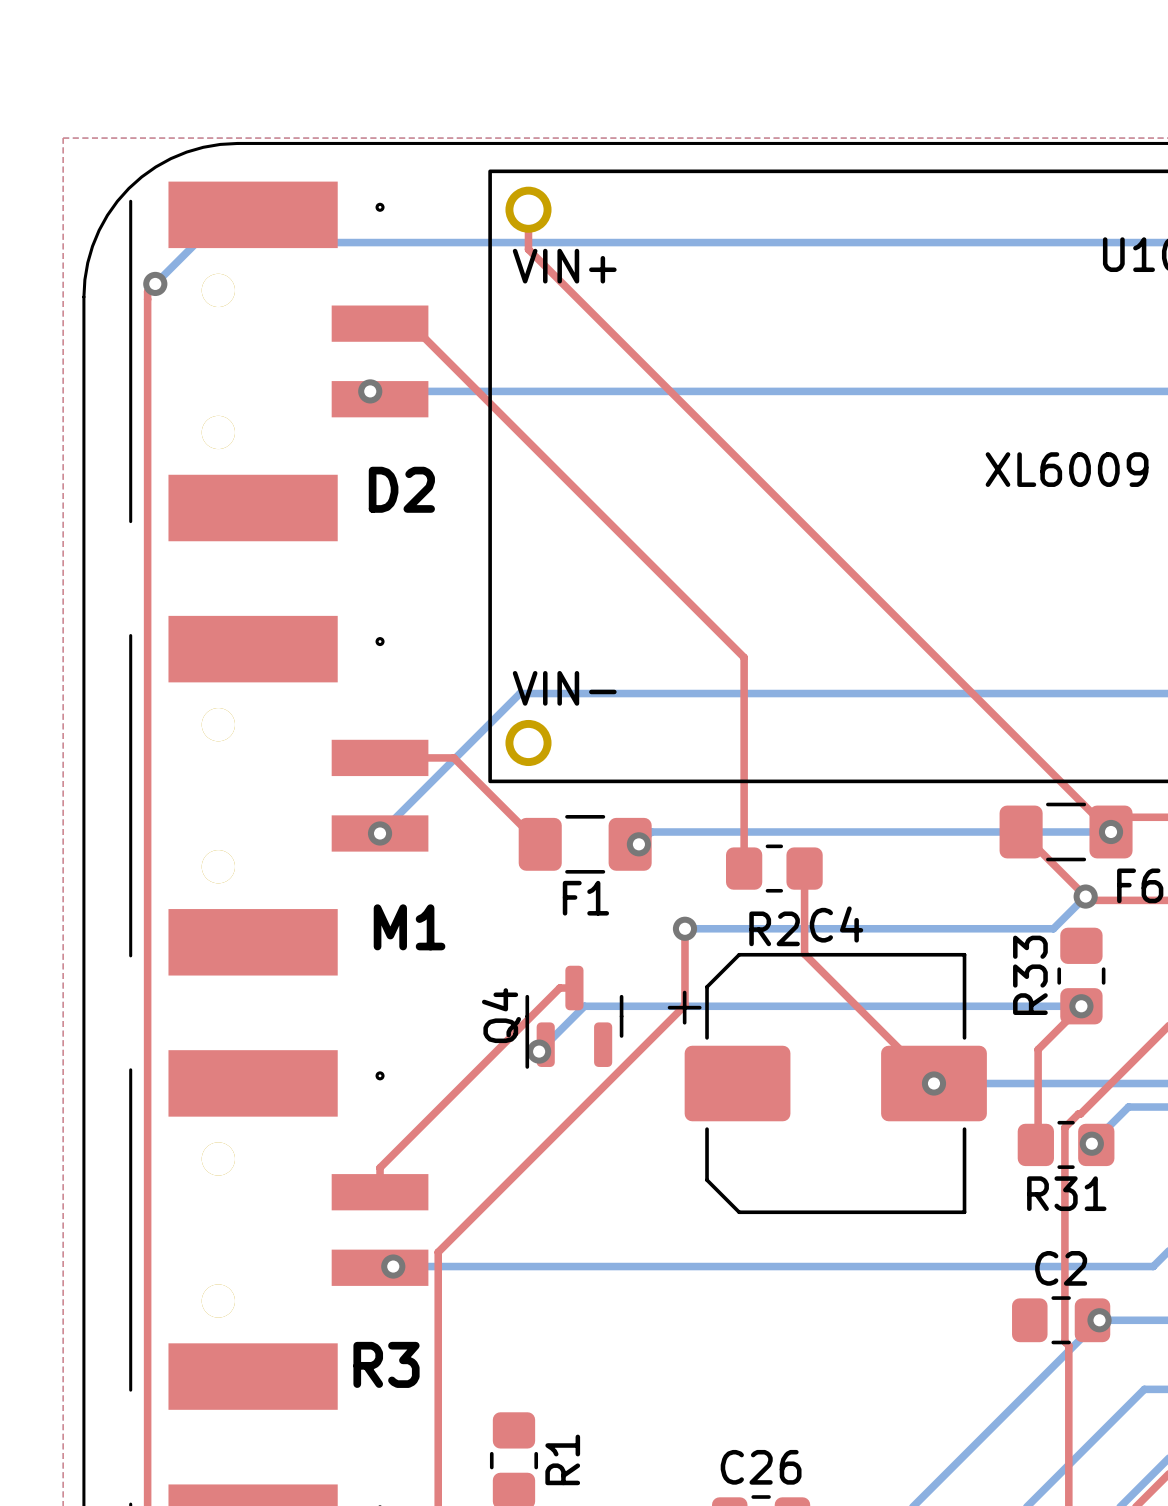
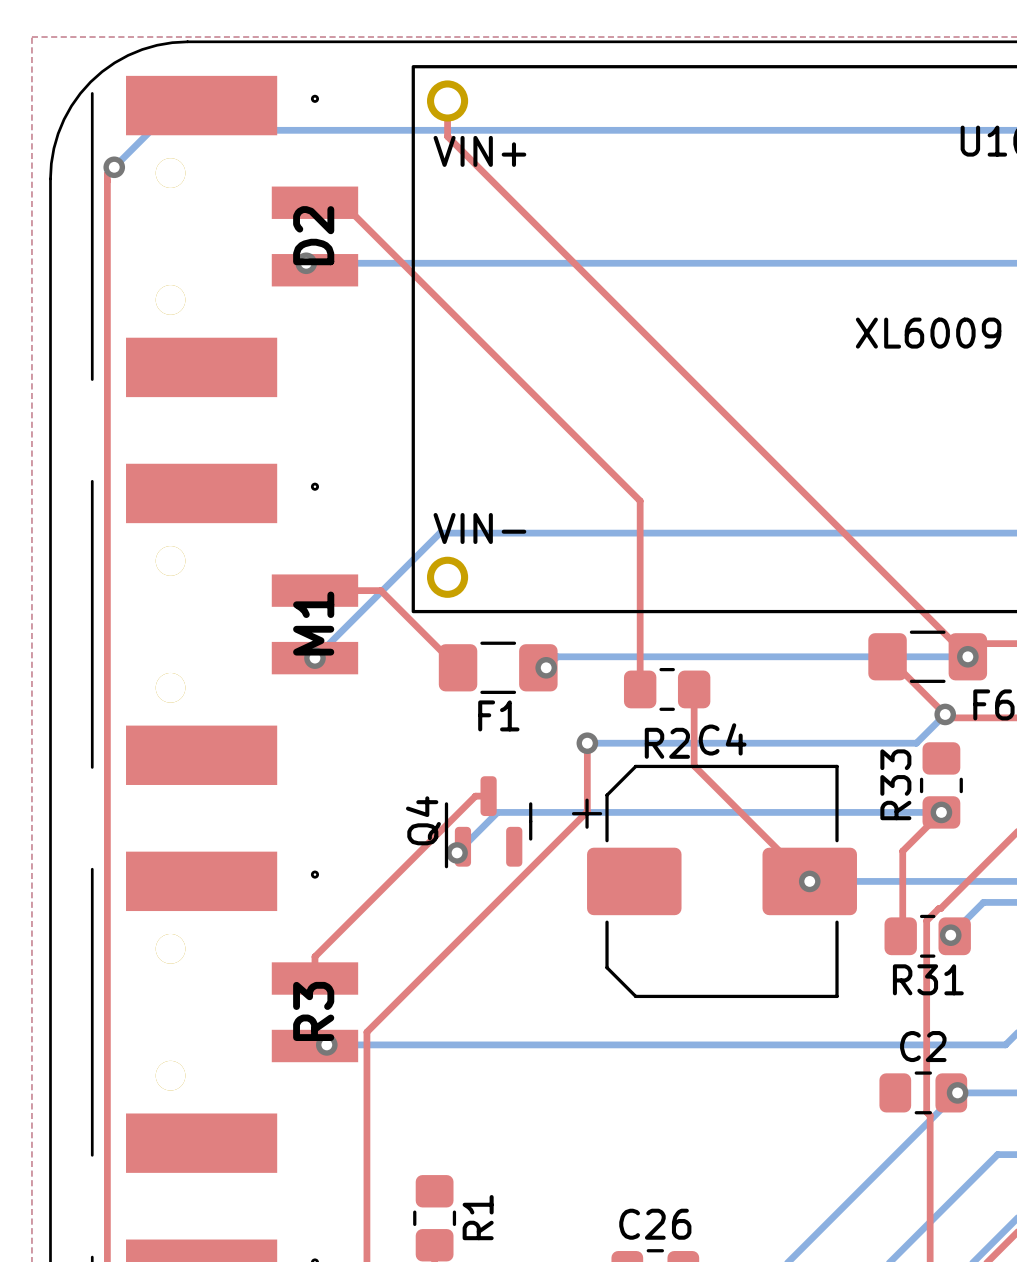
D2 name rotation: 0° (401, 489) -> 90° counterclockwise (313, 235)
D2 name position: D2 (401, 489) -> D2 (313, 235)
M1 name rotation: 0° (409, 927) -> 90° counterclockwise (313, 623)
M1 name position: M1 (409, 927) -> M1 (313, 623)
R3 name rotation: 0° (386, 1364) -> 90° counterclockwise (313, 1011)
R3 name position: R3 (386, 1364) -> R3 (313, 1011)

